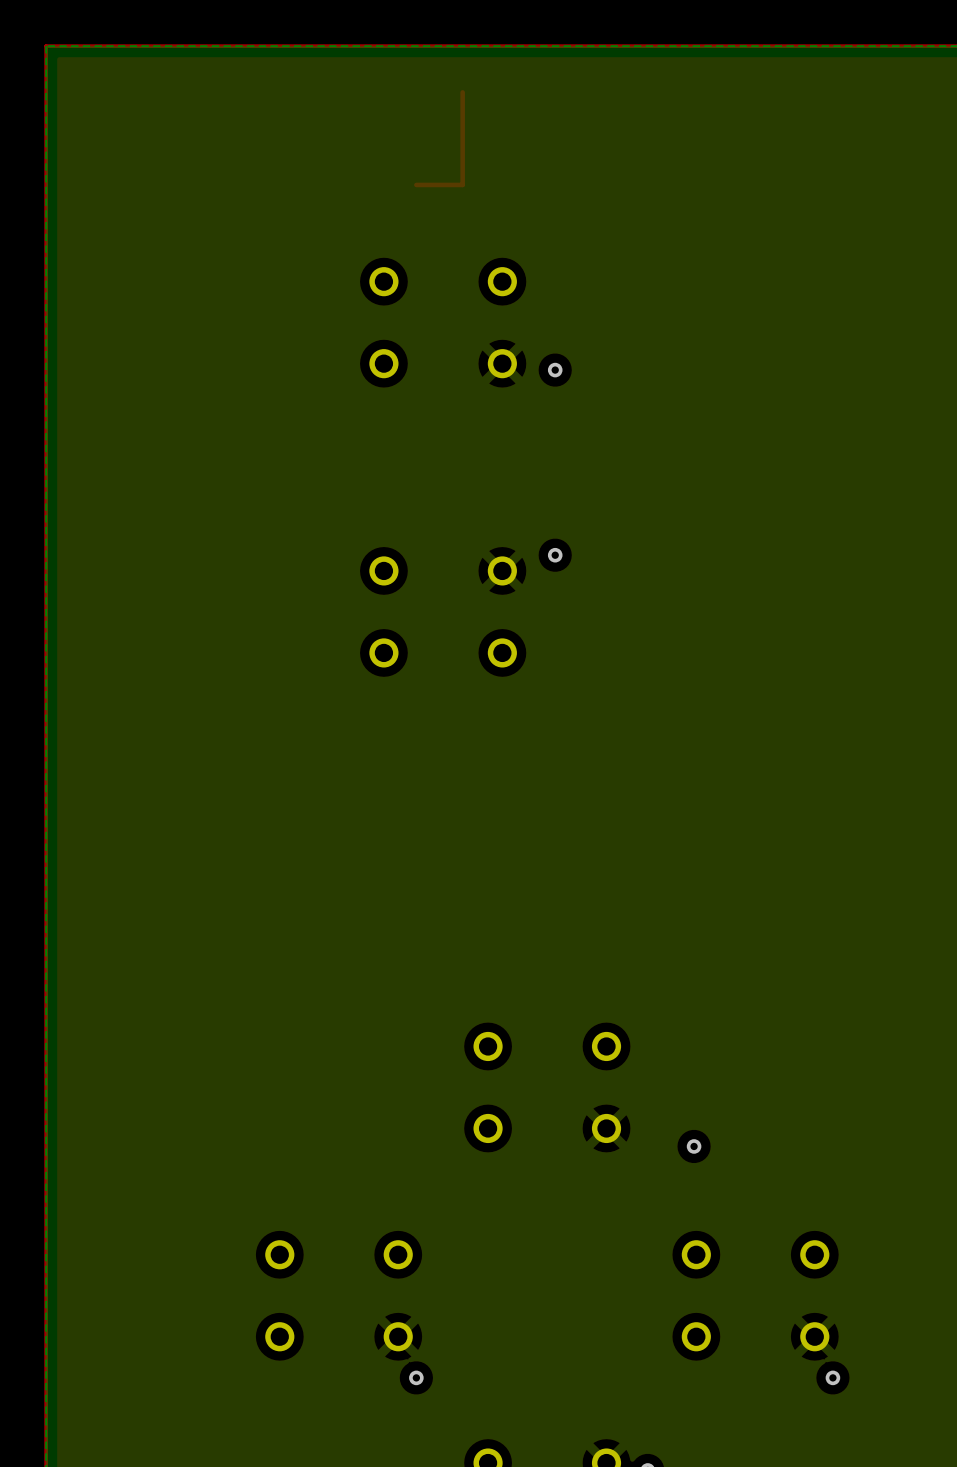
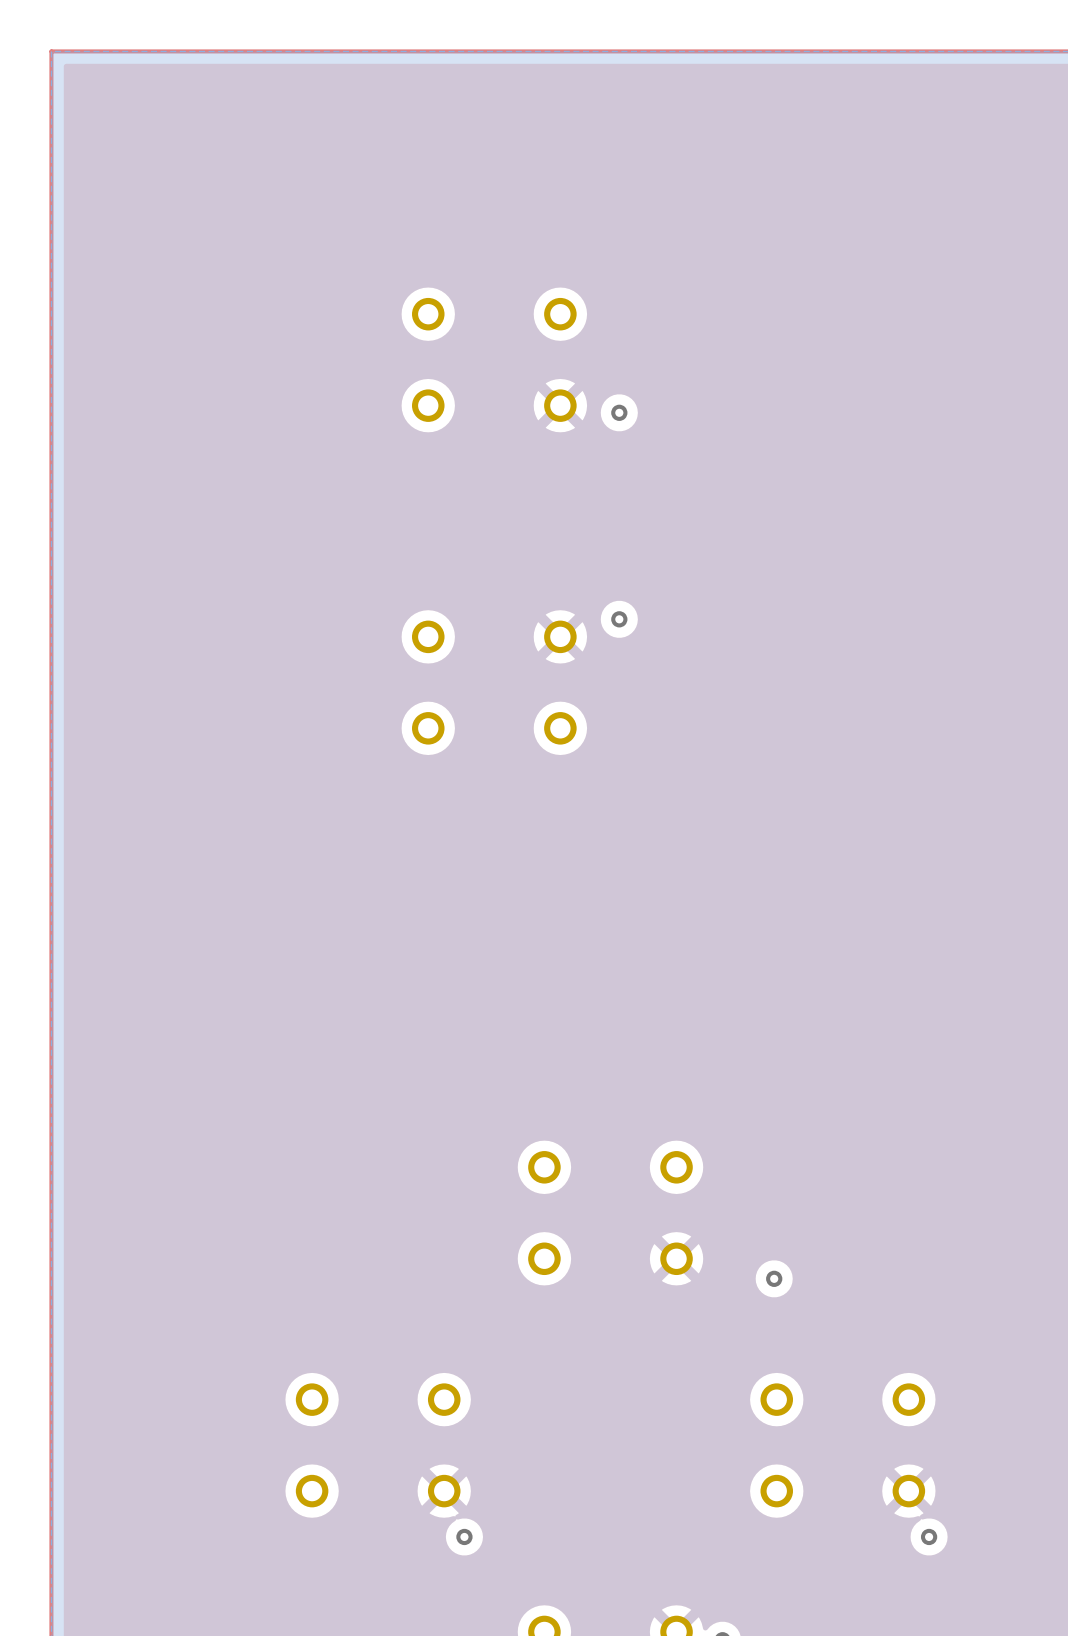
top track: (462, 92) (462, 184) (416, 184) -> none

